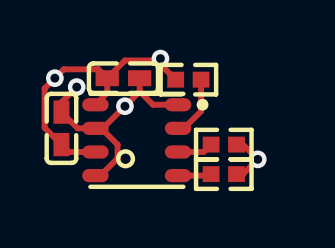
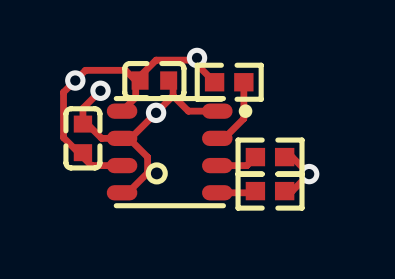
part footprint: [86, 61, 161, 96] -> [122, 60, 187, 101]
part footprint: [44, 91, 79, 166] -> [63, 106, 103, 171]

